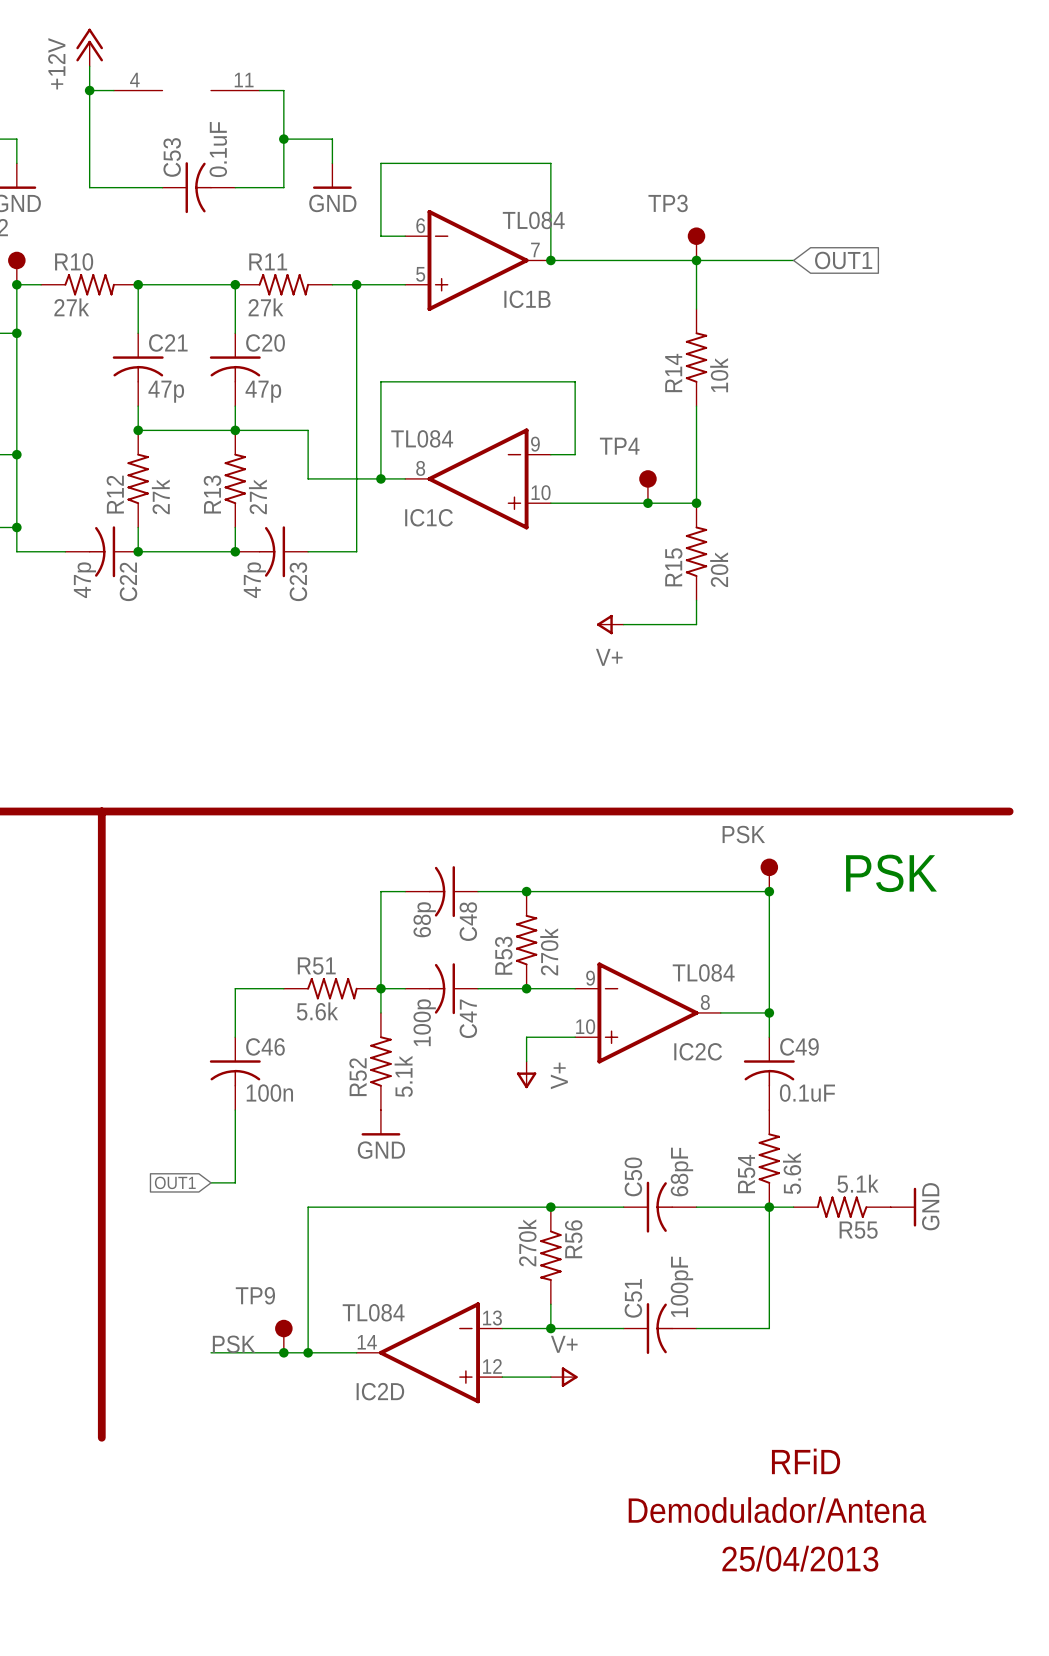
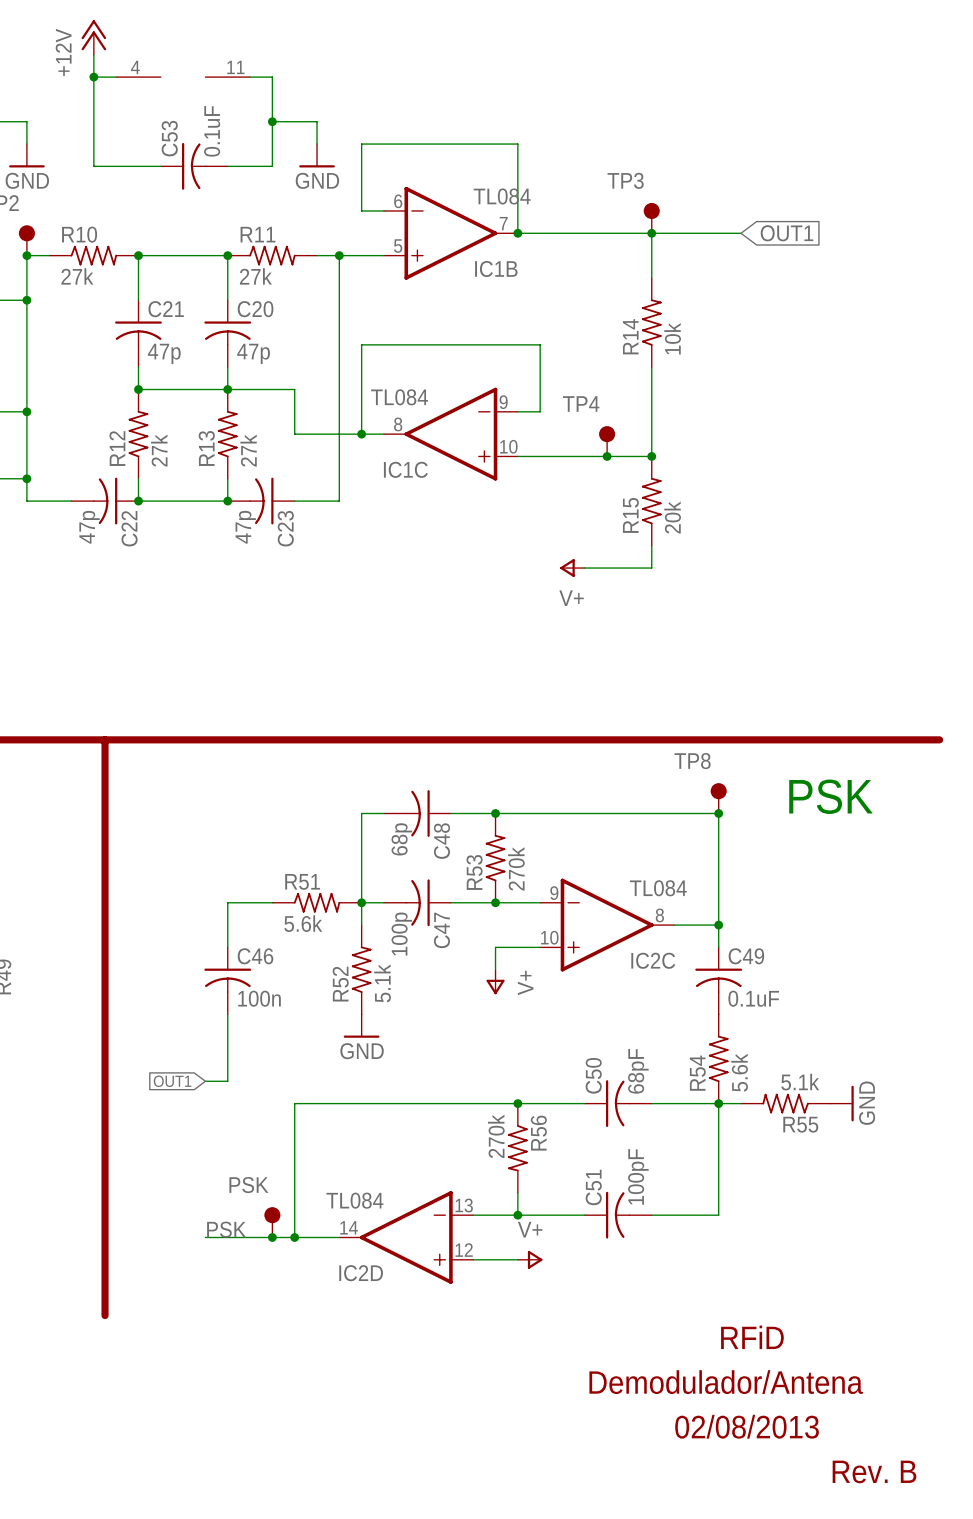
PSK name: PSK (743, 834) -> TP8 (692, 761)
TP9 name: TP9 (255, 1295) -> PSK (248, 1185)
text: 25/04/2013 (800, 1558) -> 02/08/2013 (747, 1426)
text: none -> Rev. B (874, 1471)

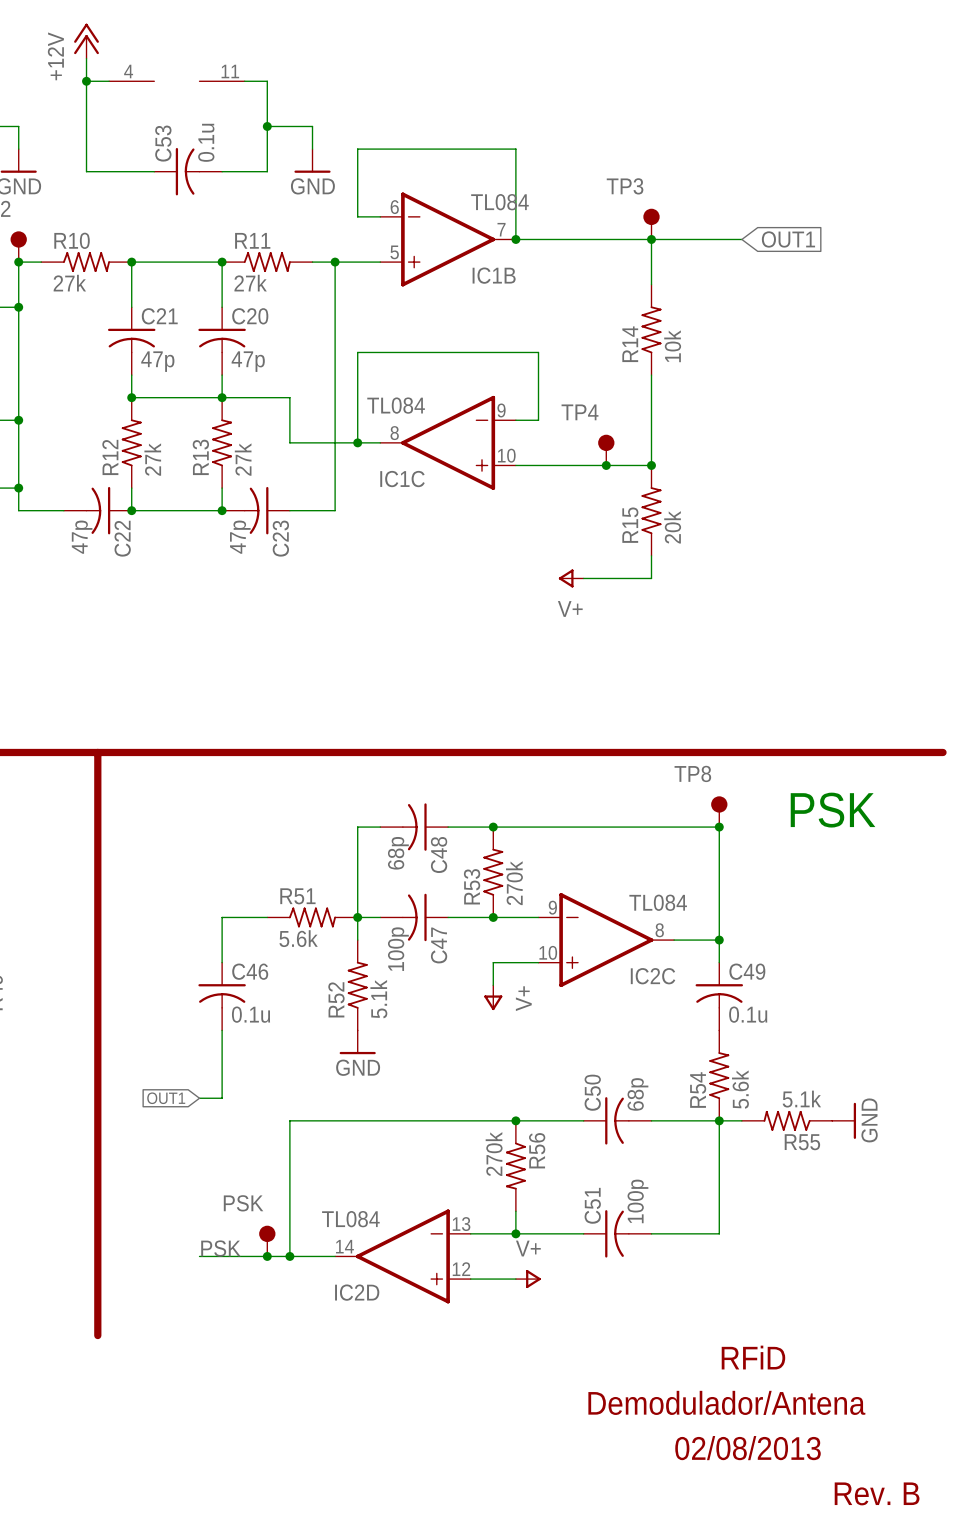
C53 value: 0.1uF (212, 131) -> 0.1u (206, 142)
C46 value: 100n (259, 998) -> 0.1u (251, 1014)
C49 value: 0.1uF (753, 998) -> 0.1u (748, 1014)
C50 value: 68pF (638, 1071) -> 68p (637, 1094)
C51 value: 100pF (638, 1176) -> 100p (637, 1201)

